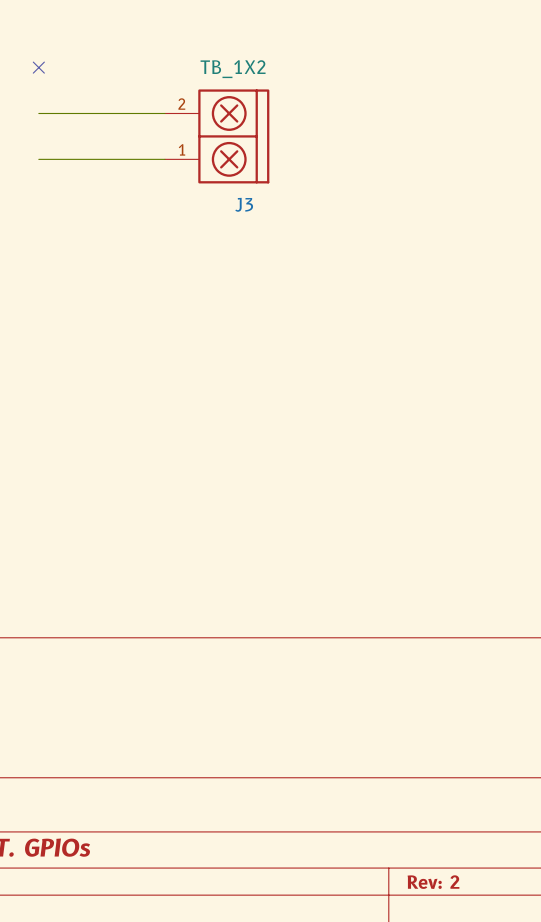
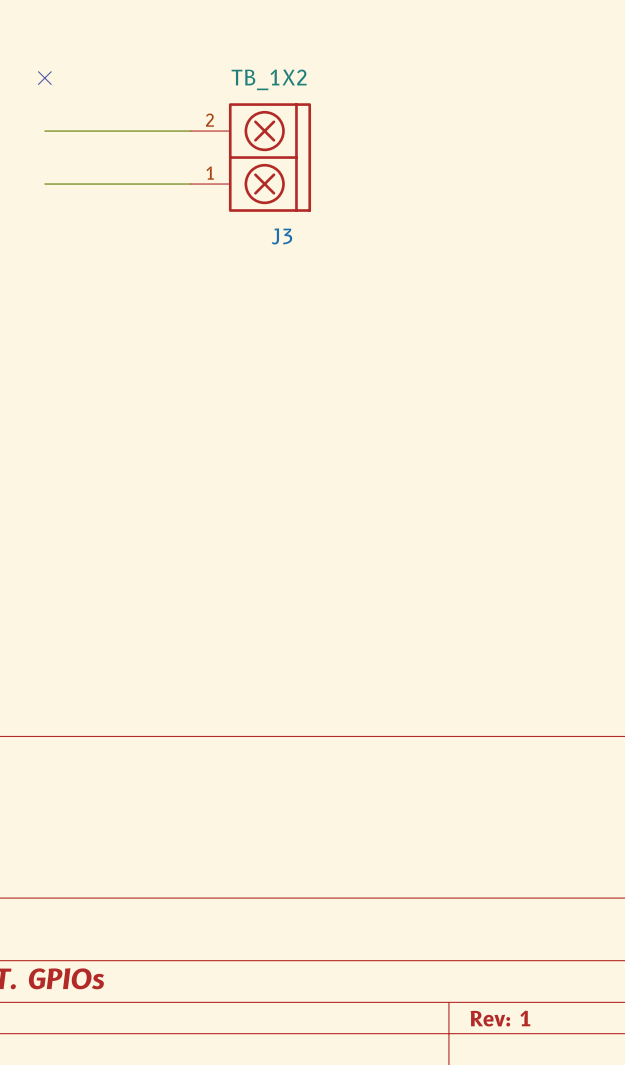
title block: Rev: 2 (433, 882) -> Rev: 1 (500, 1018)

